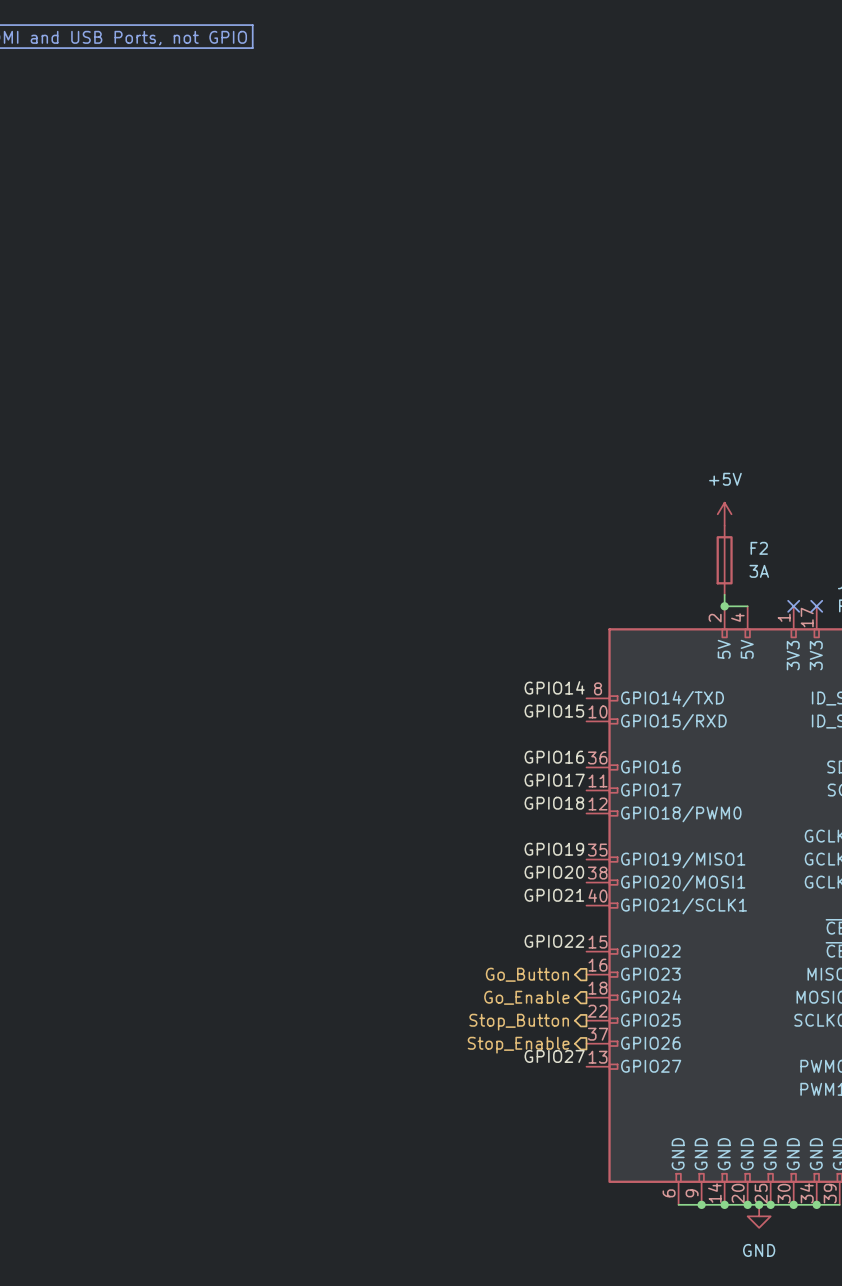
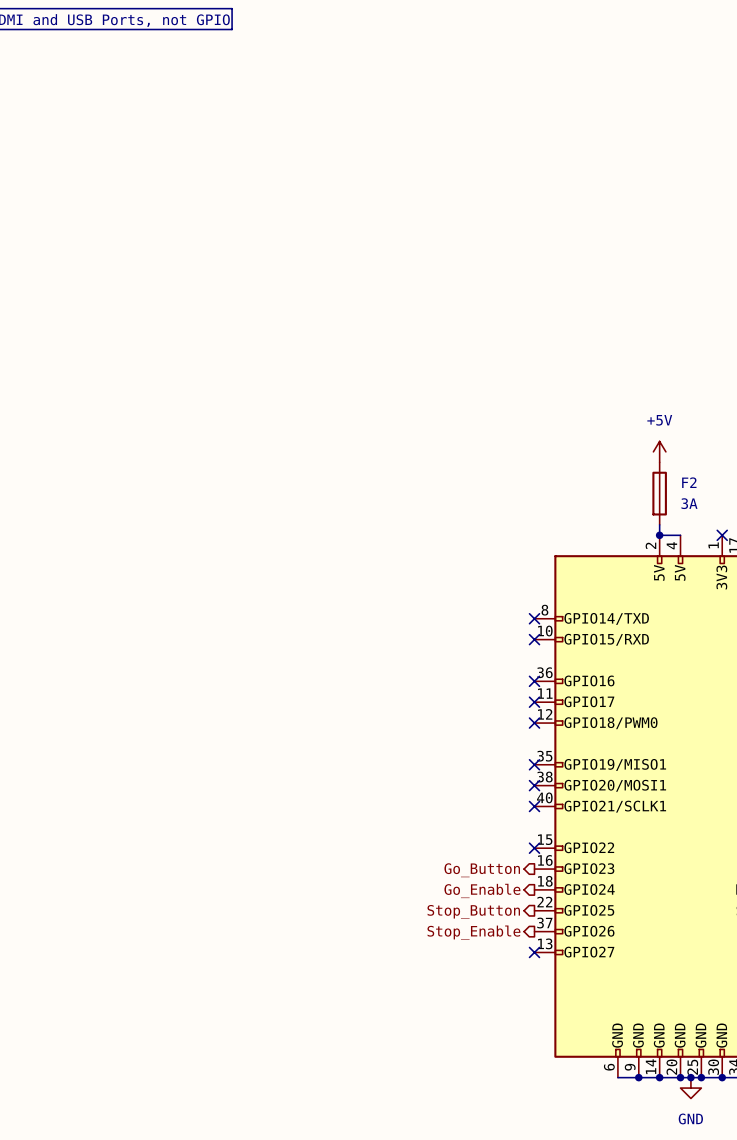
label: GPIO14 (554, 687) -> none
no-connect mark: none -> (534, 618)
label: GPIO15 (554, 711) -> none
no-connect mark: none -> (534, 639)
label: GPIO16 (554, 757) -> none
no-connect mark: none -> (534, 681)
label: GPIO17 (554, 780) -> none
no-connect mark: none -> (534, 702)
label: GPIO18 (554, 803) -> none
no-connect mark: none -> (534, 723)
label: GPIO19 (554, 849) -> none
no-connect mark: none -> (534, 764)
label: GPIO20 (554, 872) -> none
no-connect mark: none -> (534, 785)
label: GPIO21 (554, 895) -> none
no-connect mark: none -> (534, 806)
label: GPIO22 (554, 941) -> none
no-connect mark: none -> (534, 848)
label: GPIO27 (554, 1056) -> none
no-connect mark: none -> (534, 952)

